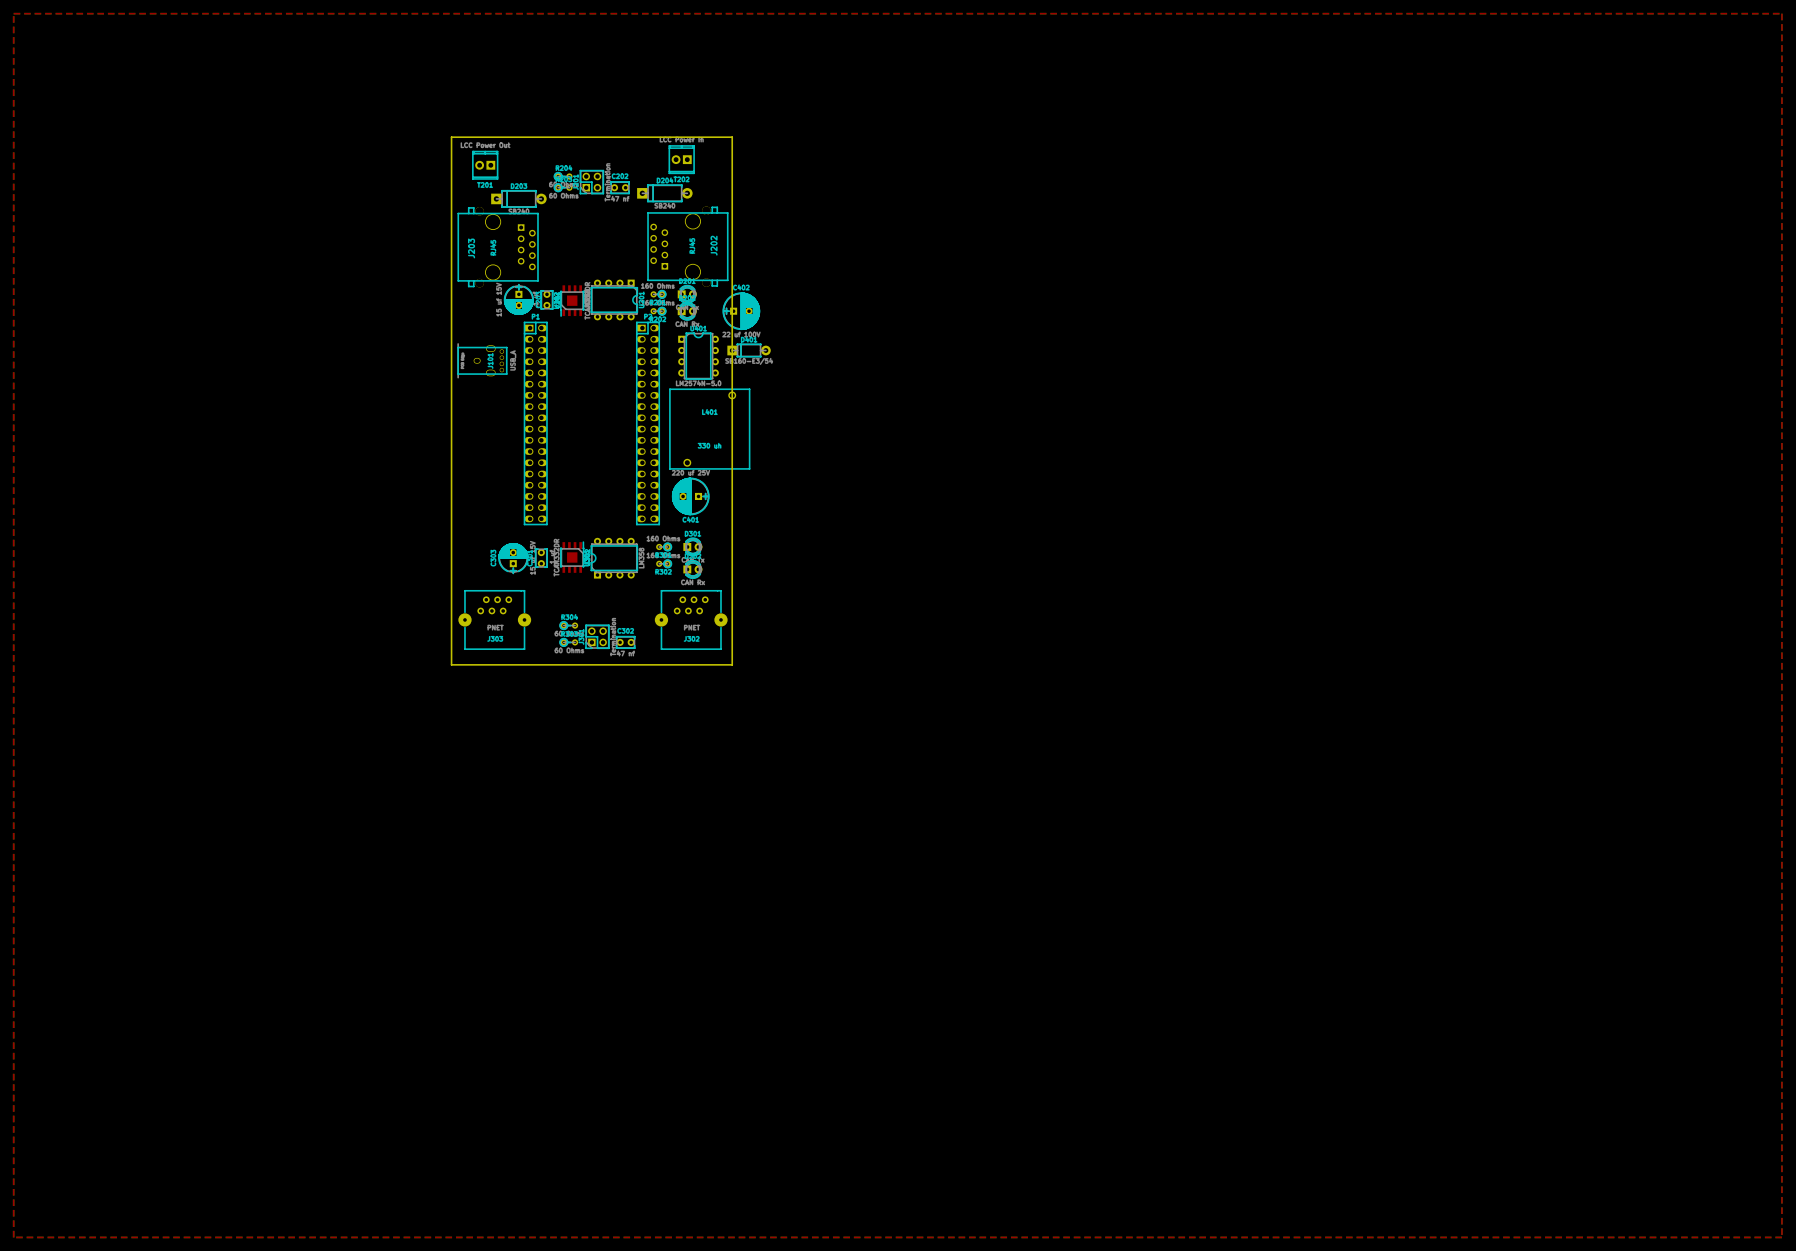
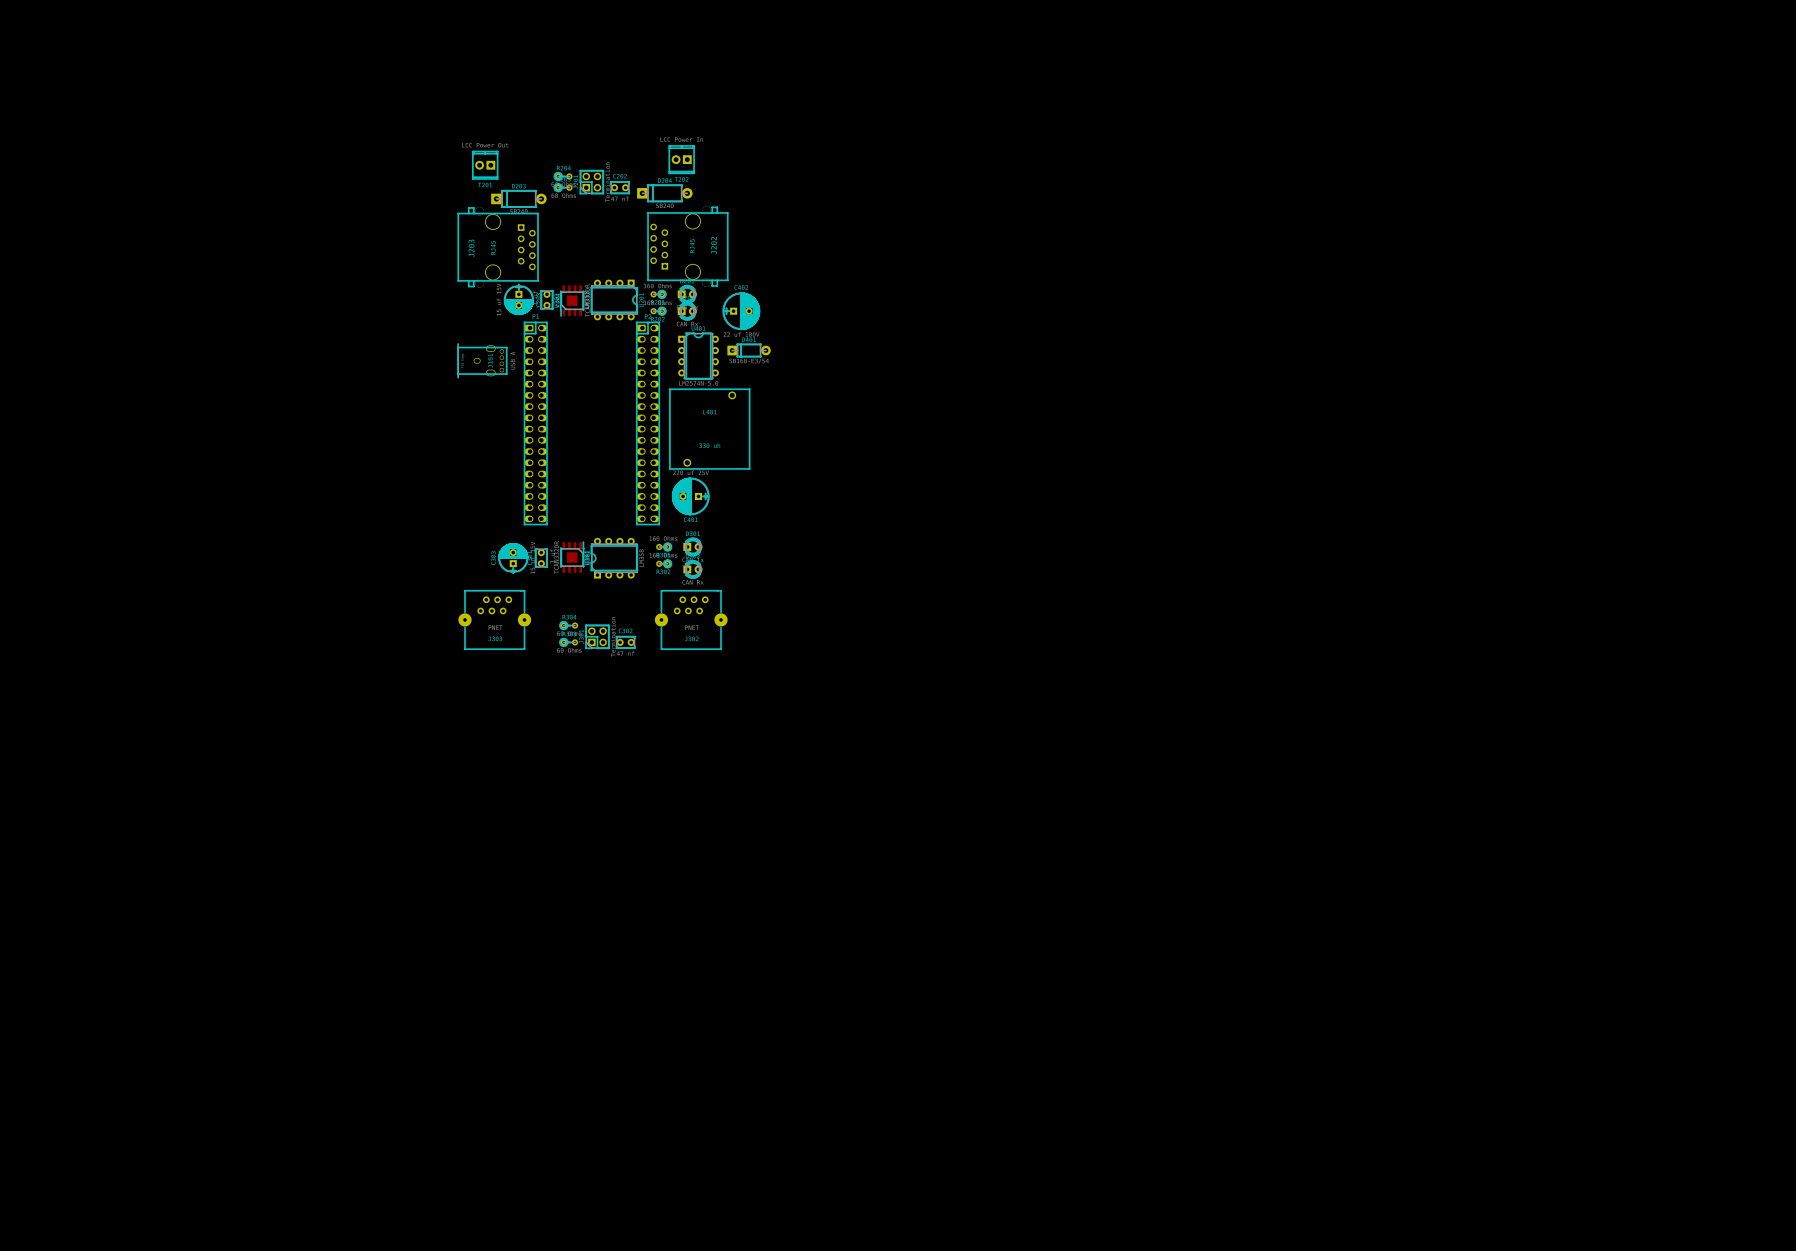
top zone outline: (13, 13) (1781, 13) (1781, 1237) (13, 1237) (13, 13) -> none
board edge: (451, 137) (732, 137) (732, 664) (451, 664) (451, 137) -> none

